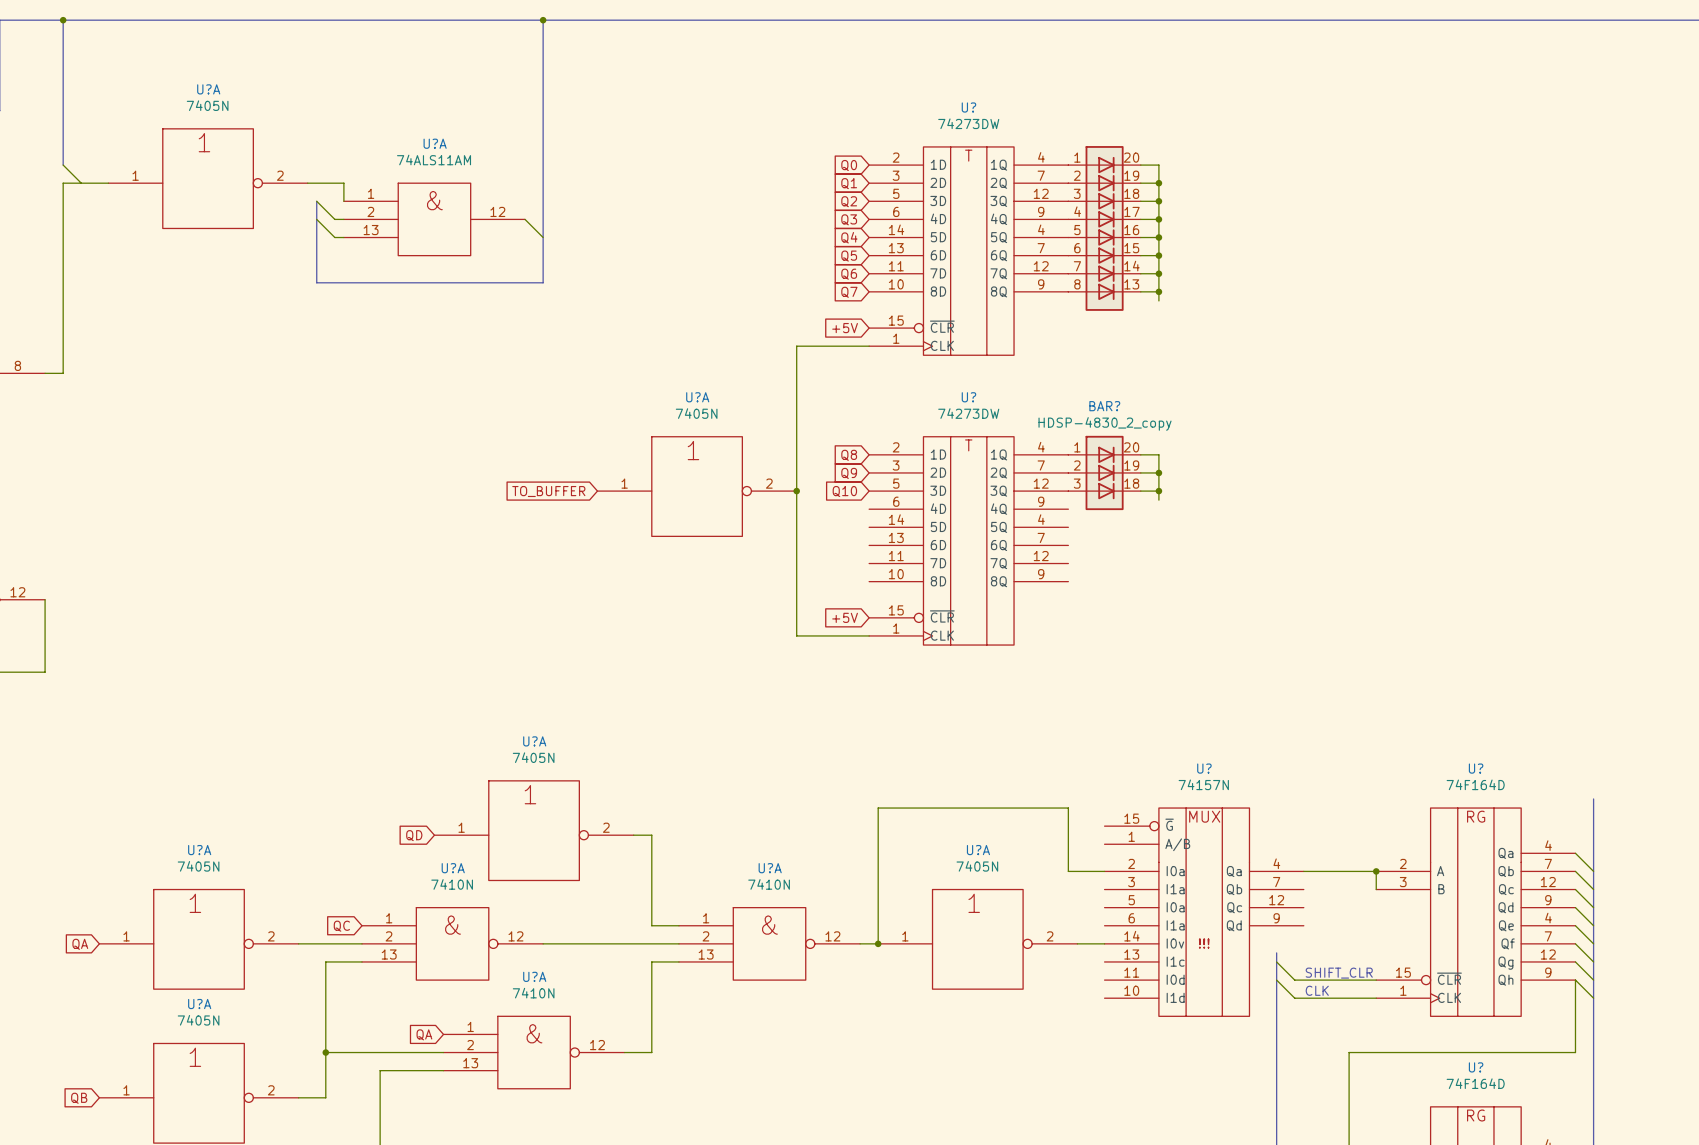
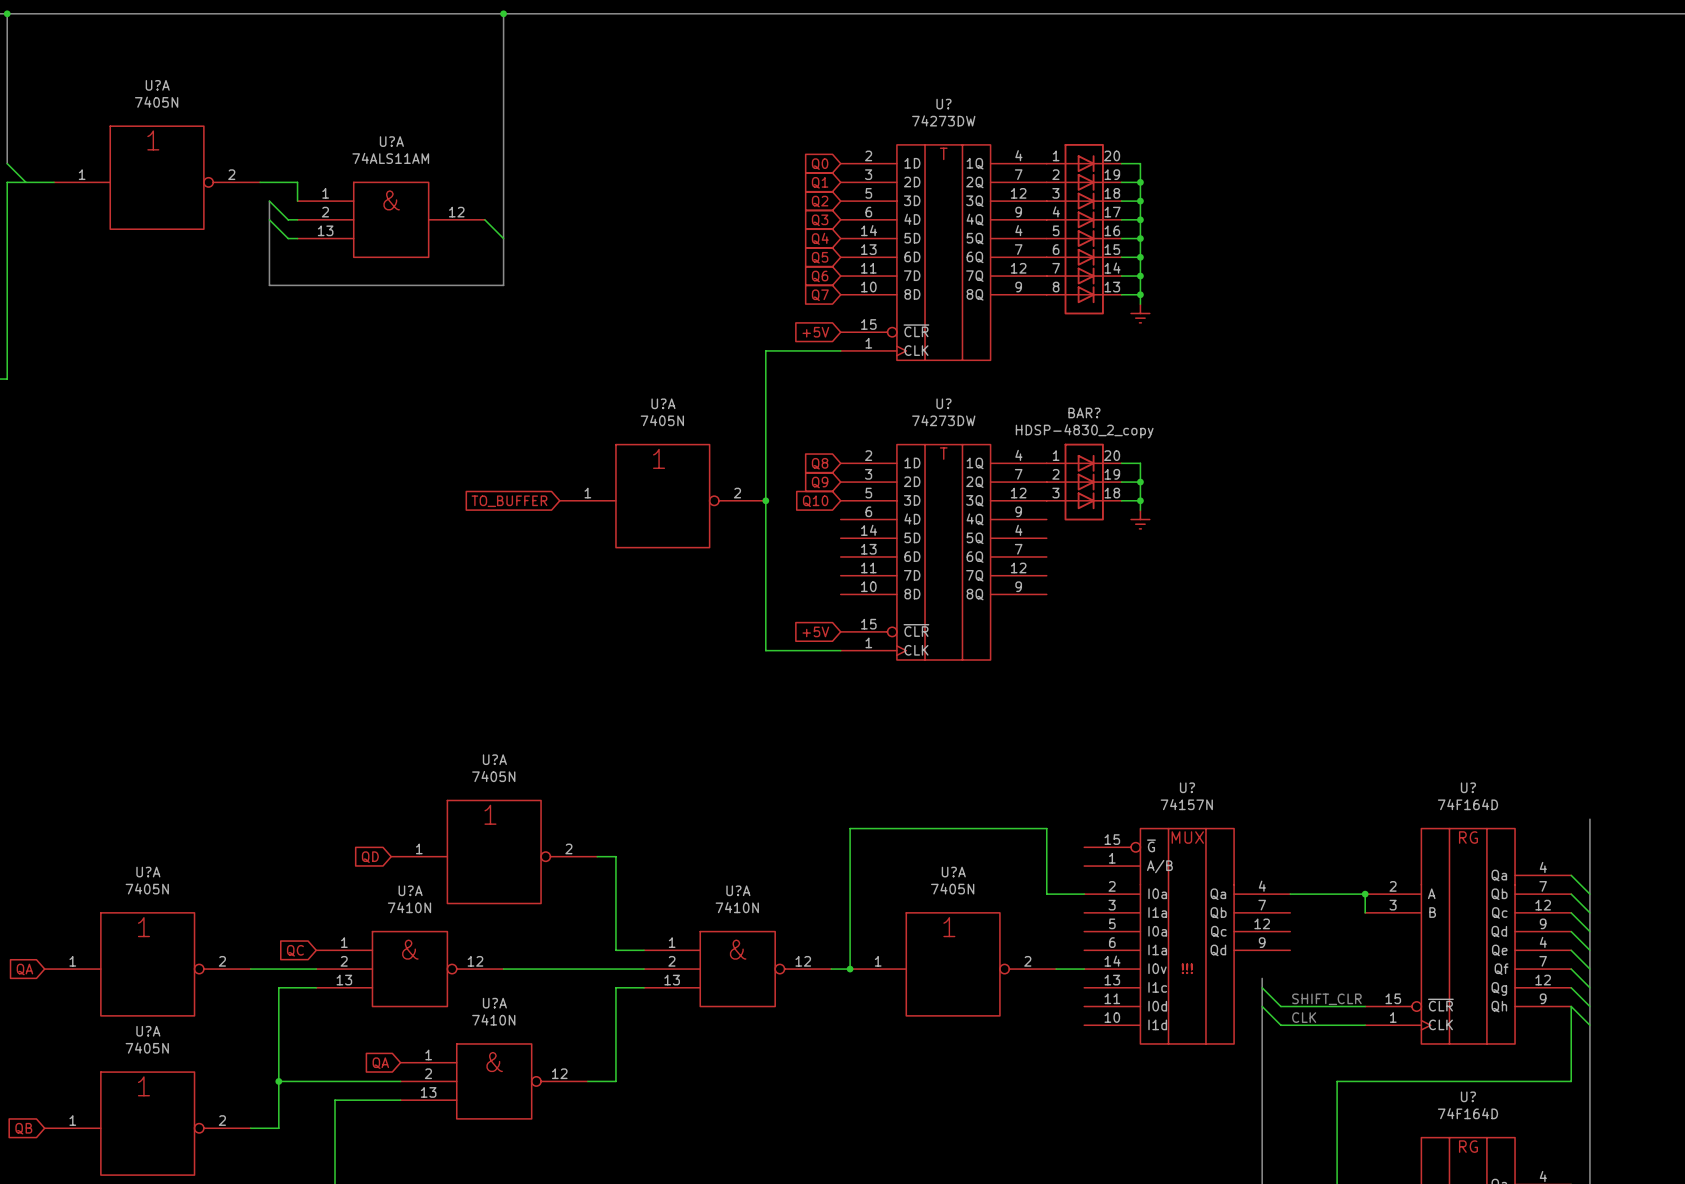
power symbol: none -> (1140, 313)
power symbol: none -> (1140, 519)

